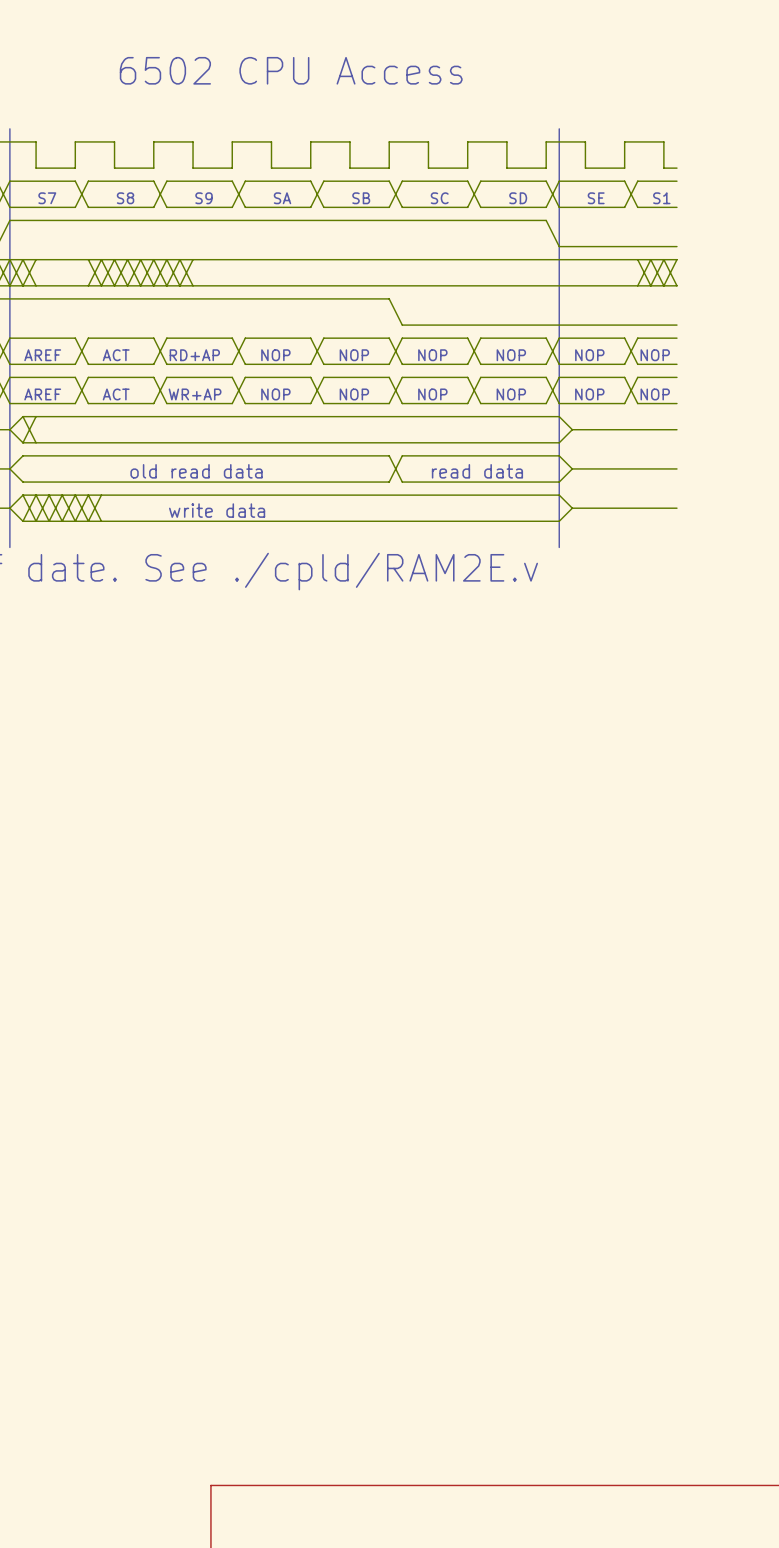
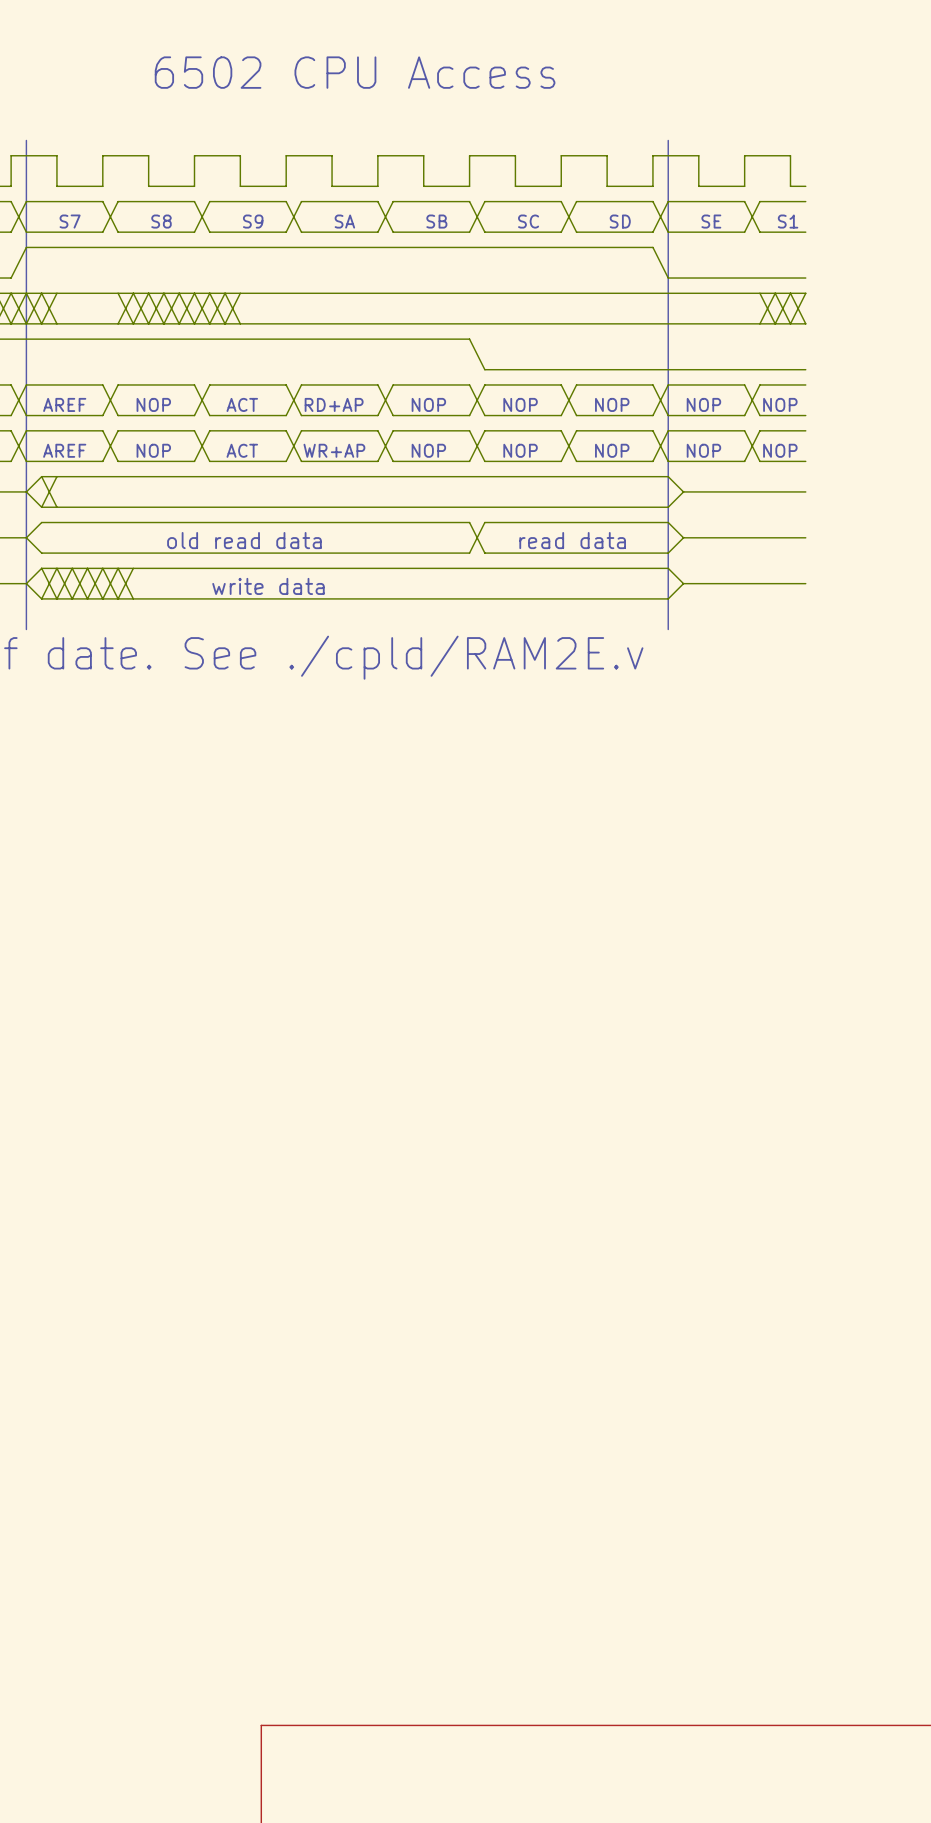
text: ACT (116, 355) -> NOP (153, 404)
text position: RD+AP (194, 355) -> RD+AP (334, 404)
text: none -> ACT (242, 404)
text: NOP (275, 355) -> none
text: ACT (116, 394) -> NOP (153, 450)
text: none -> ACT (242, 450)
text position: WR+AP (195, 394) -> WR+AP (334, 450)
text: NOP (275, 394) -> none

